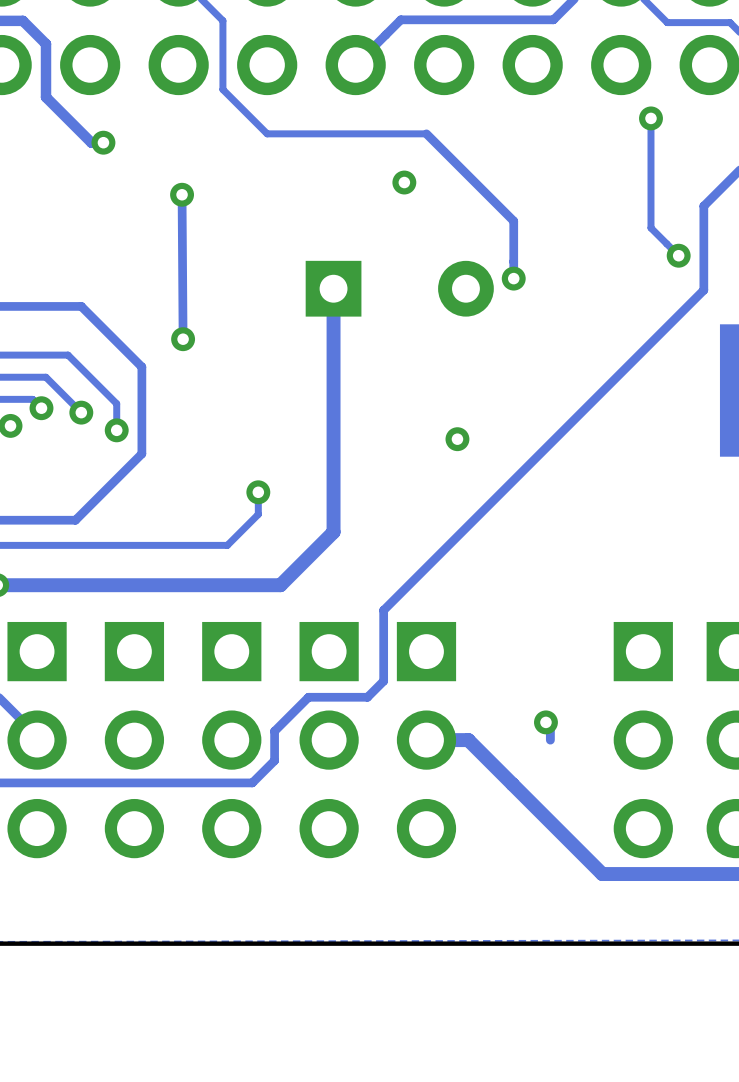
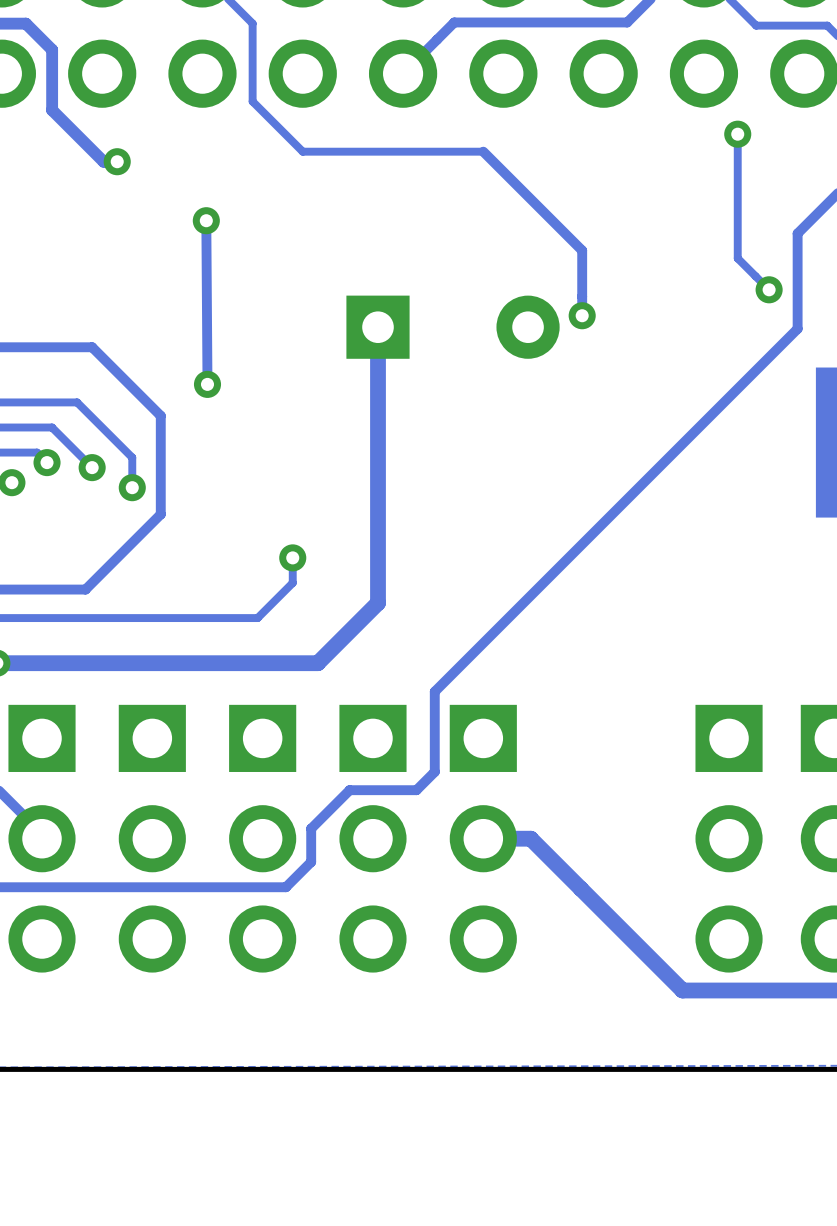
via: (404, 182) -> none
via: (457, 439) -> none
track: (545, 722) (550, 726) (550, 740) -> none
via: (545, 722) -> none

